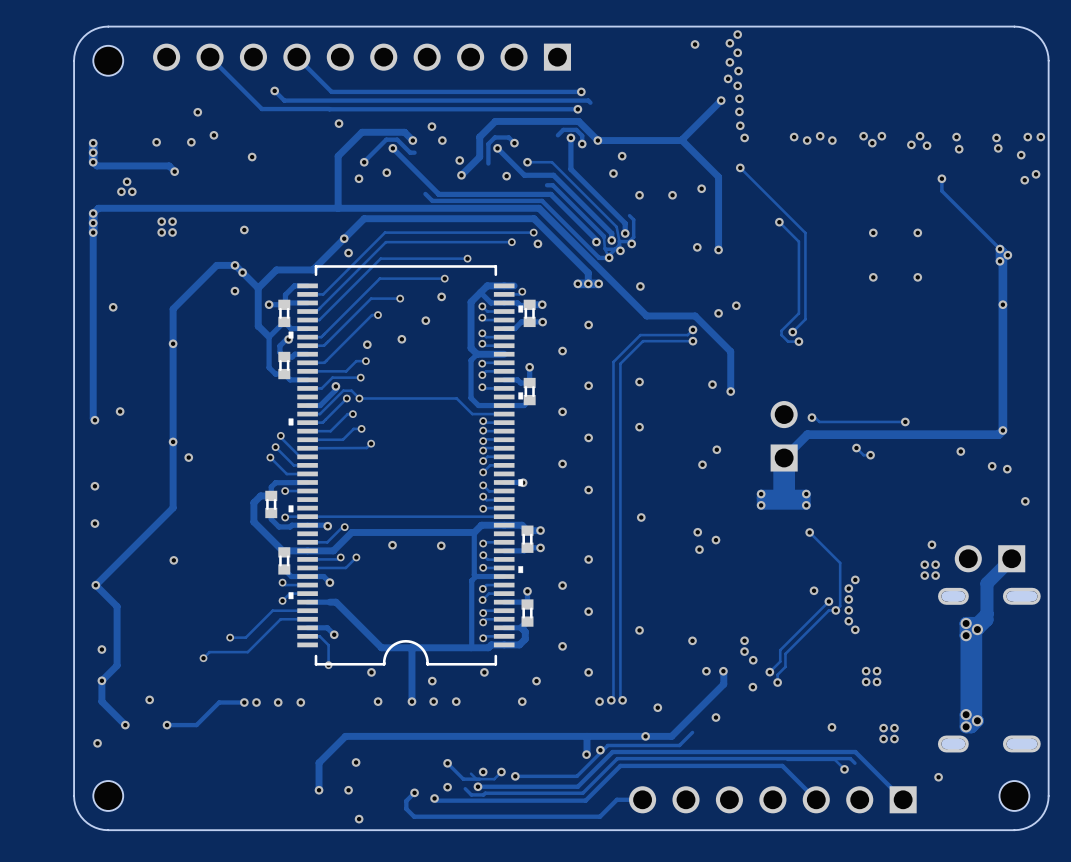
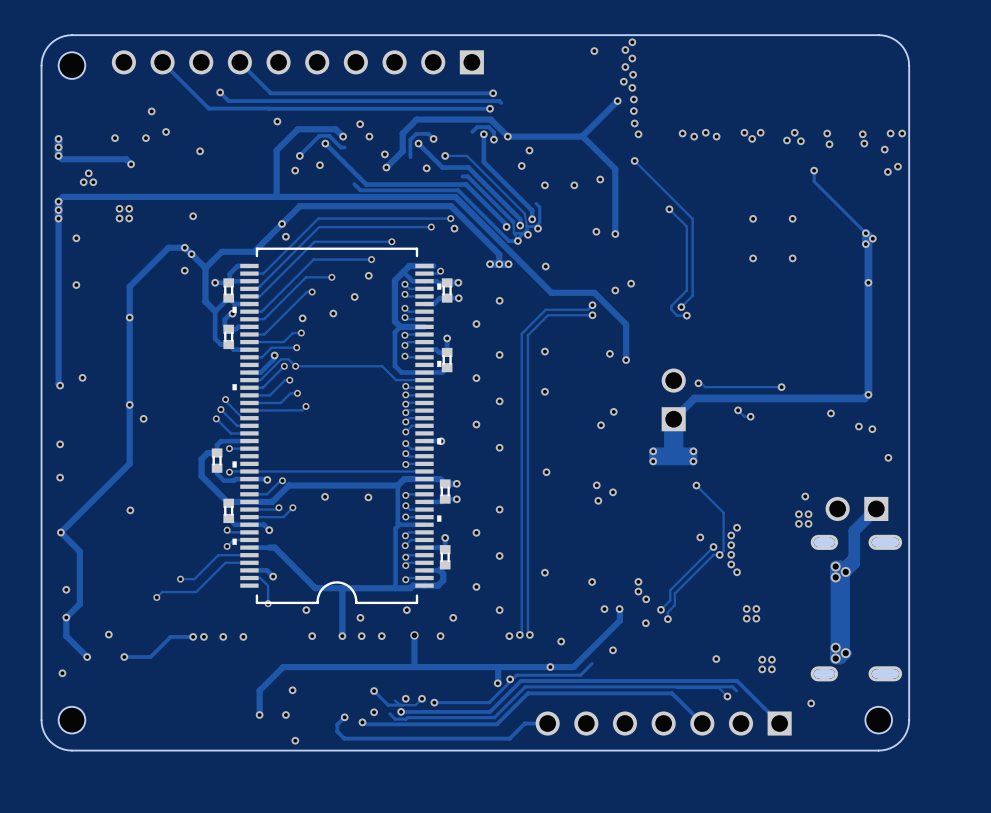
via: none -> (76, 238)
track: none -> (414, 635) (414, 667)
via: none -> (414, 635)

